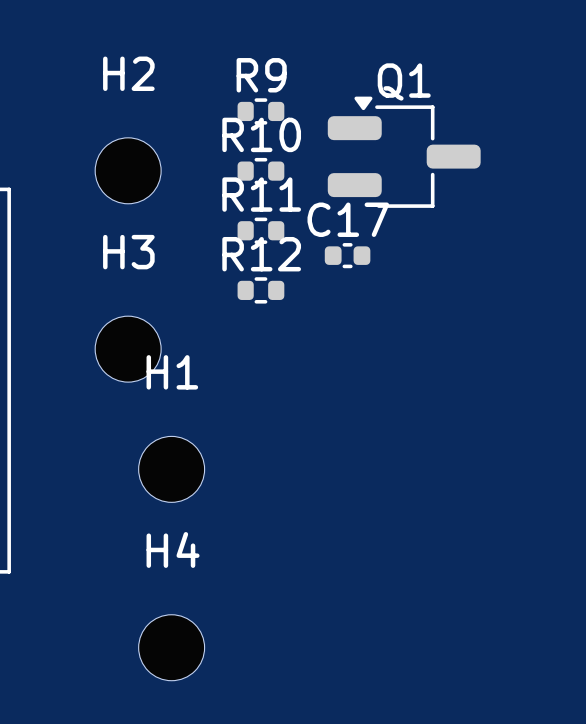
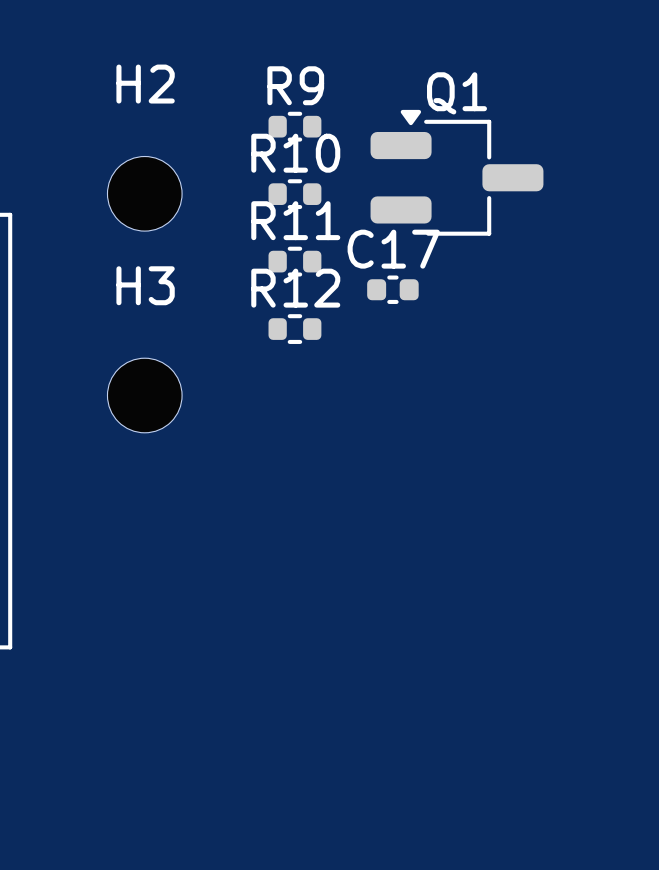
H1: (171, 469) -> none
H4: (171, 647) -> none

